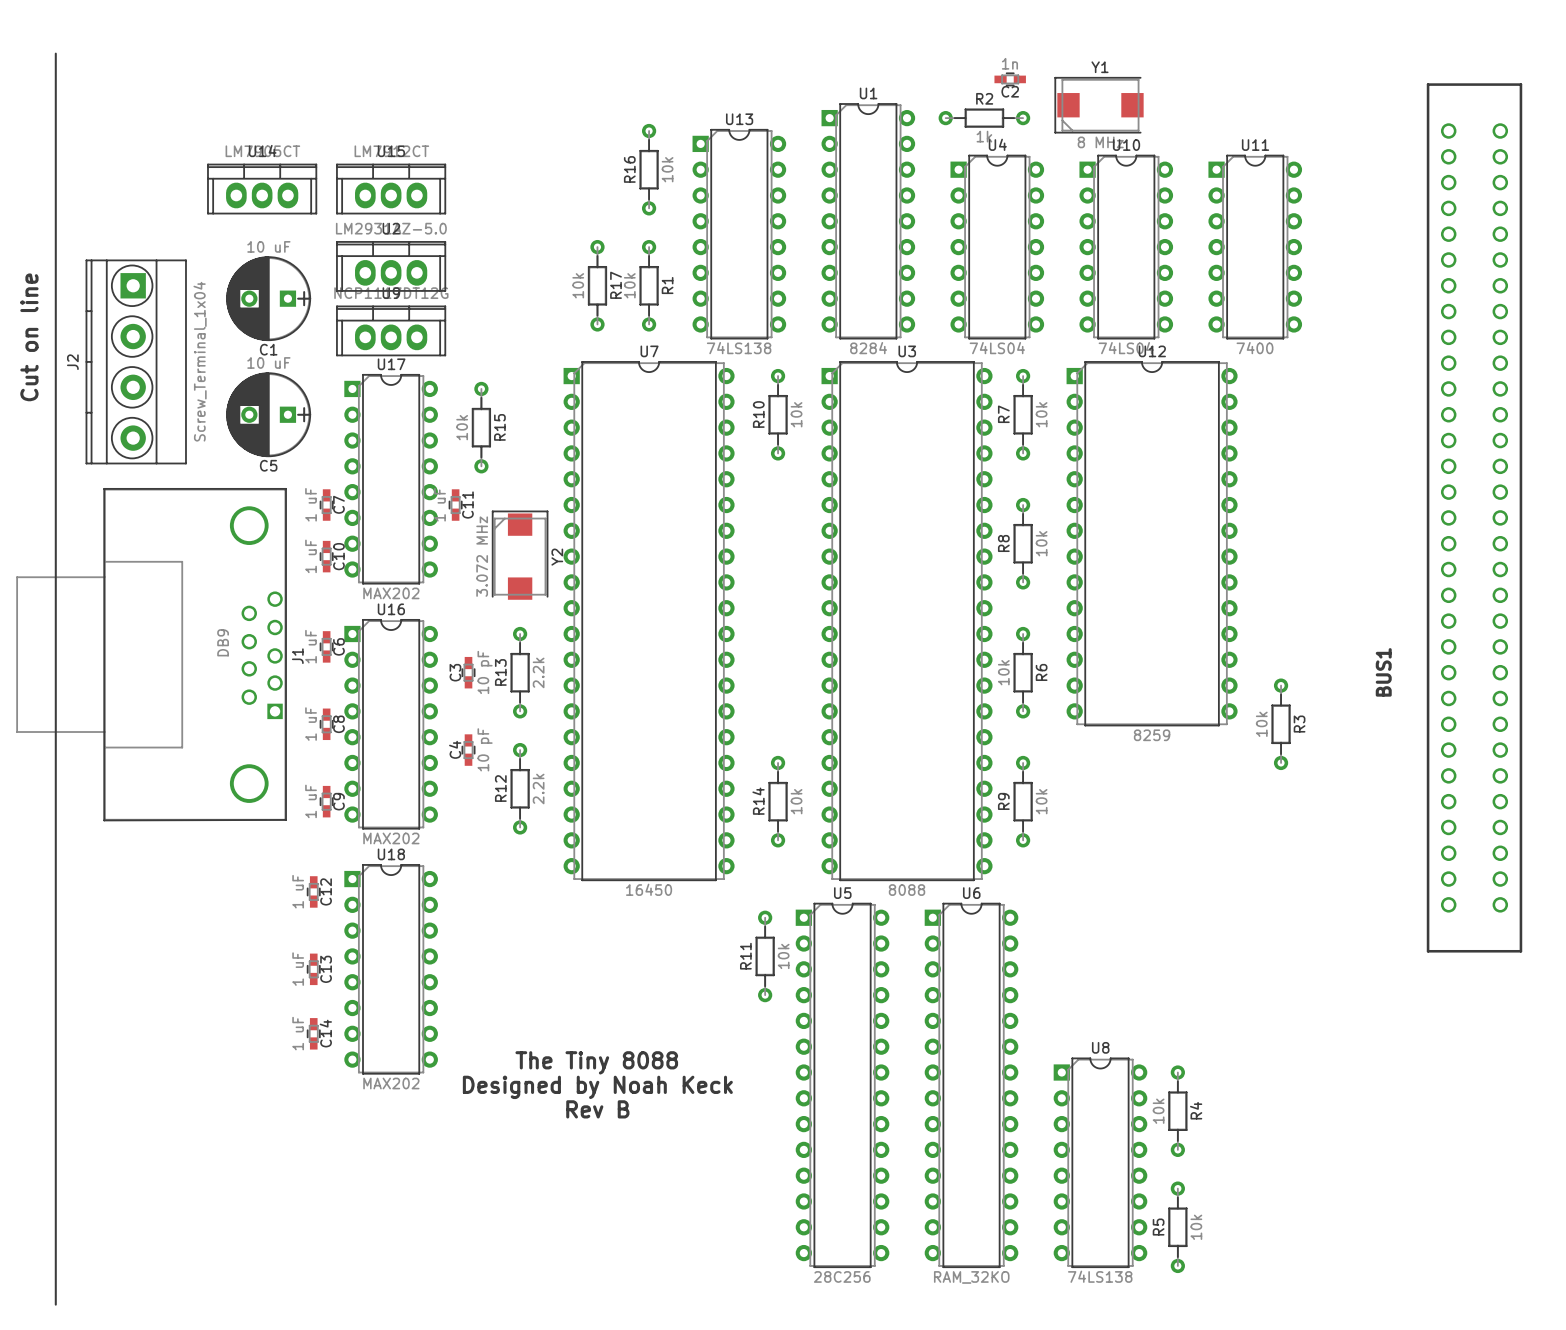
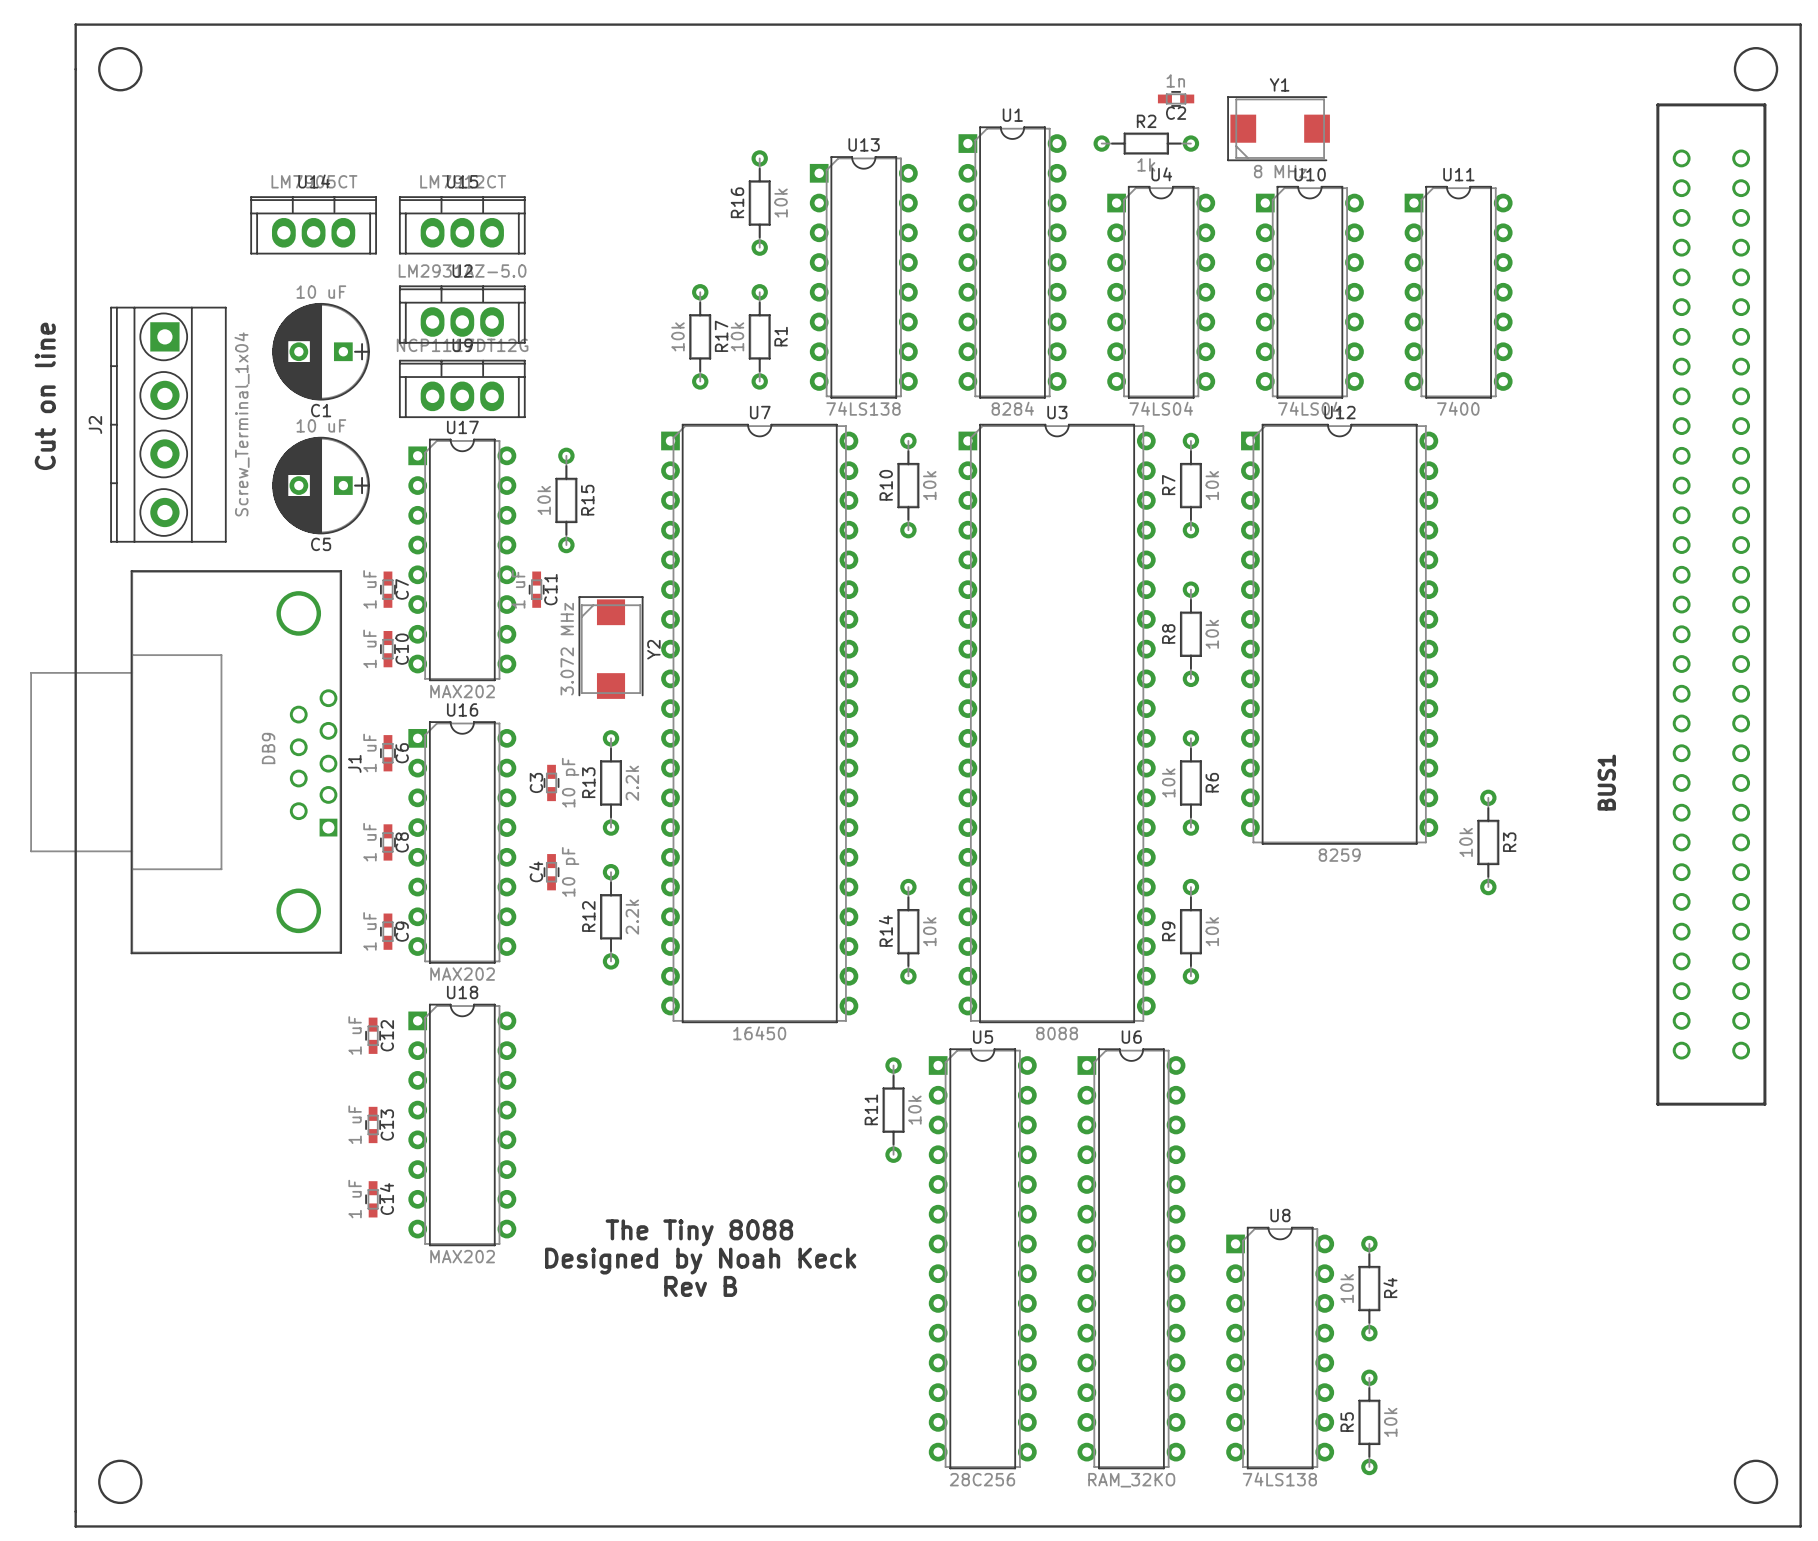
drawing: none -> [98, 47, 143, 92]
drawing: none -> [1733, 47, 1779, 92]
line: none -> (75, 69) (75, 24) (1800, 24) (1800, 1526) (75, 1526) (75, 1511)
drawing: none -> [98, 1459, 143, 1505]
drawing: none -> [1733, 1459, 1779, 1505]

